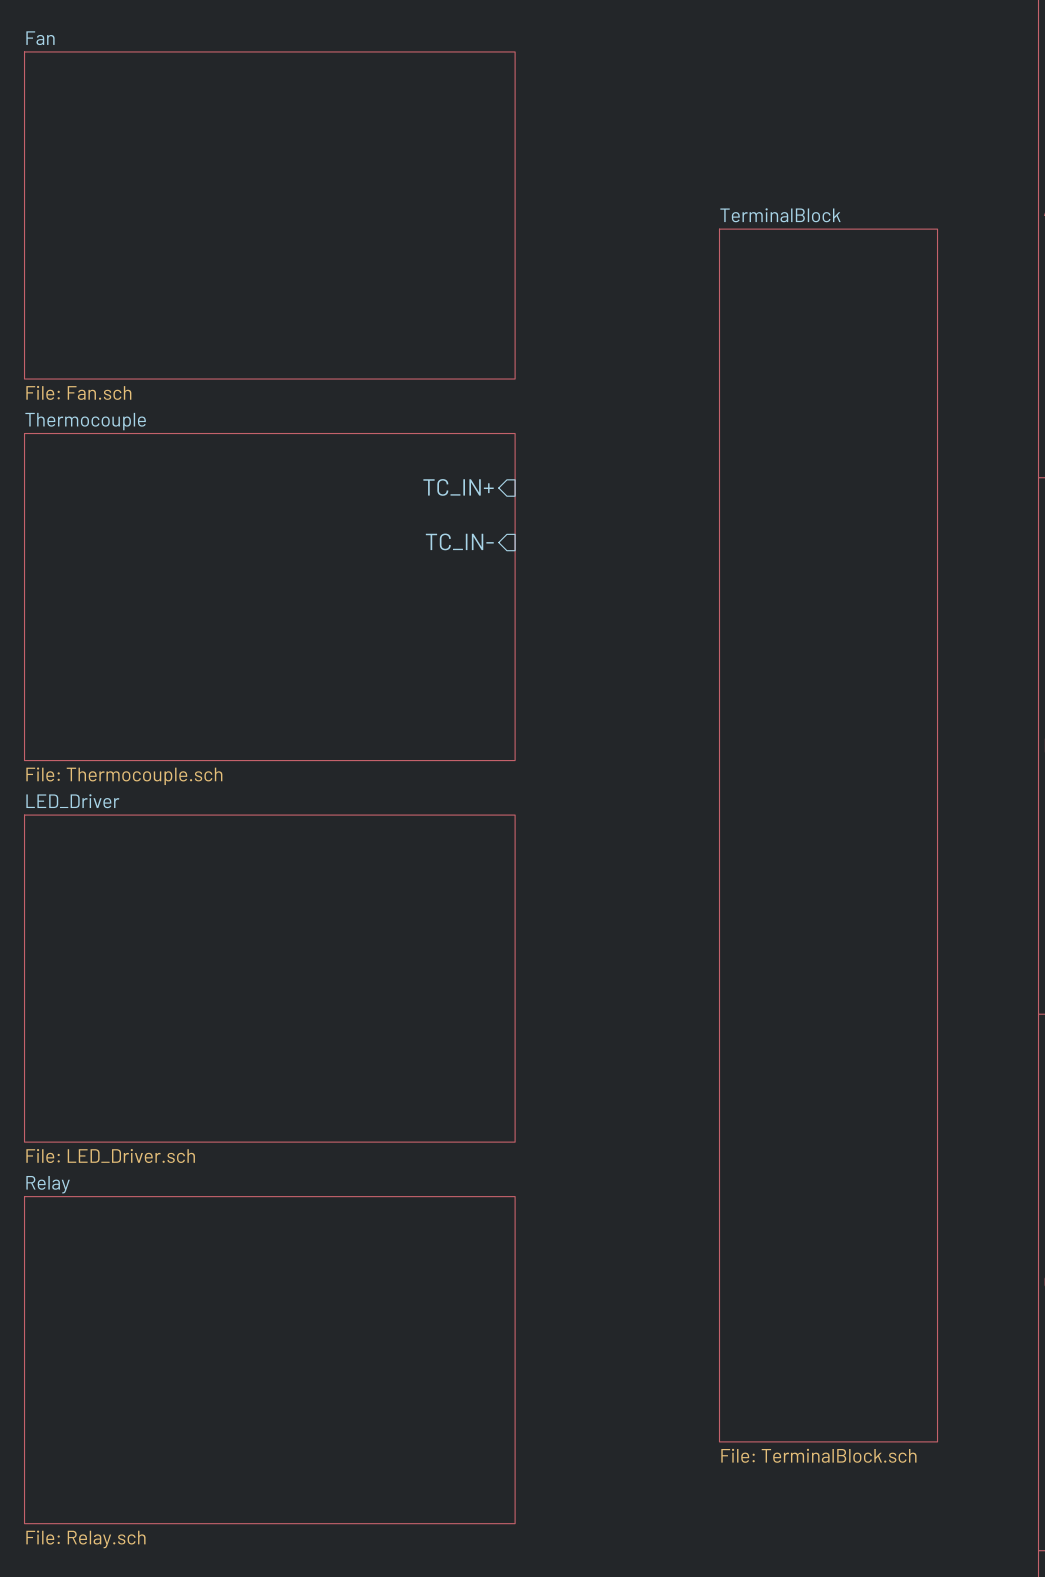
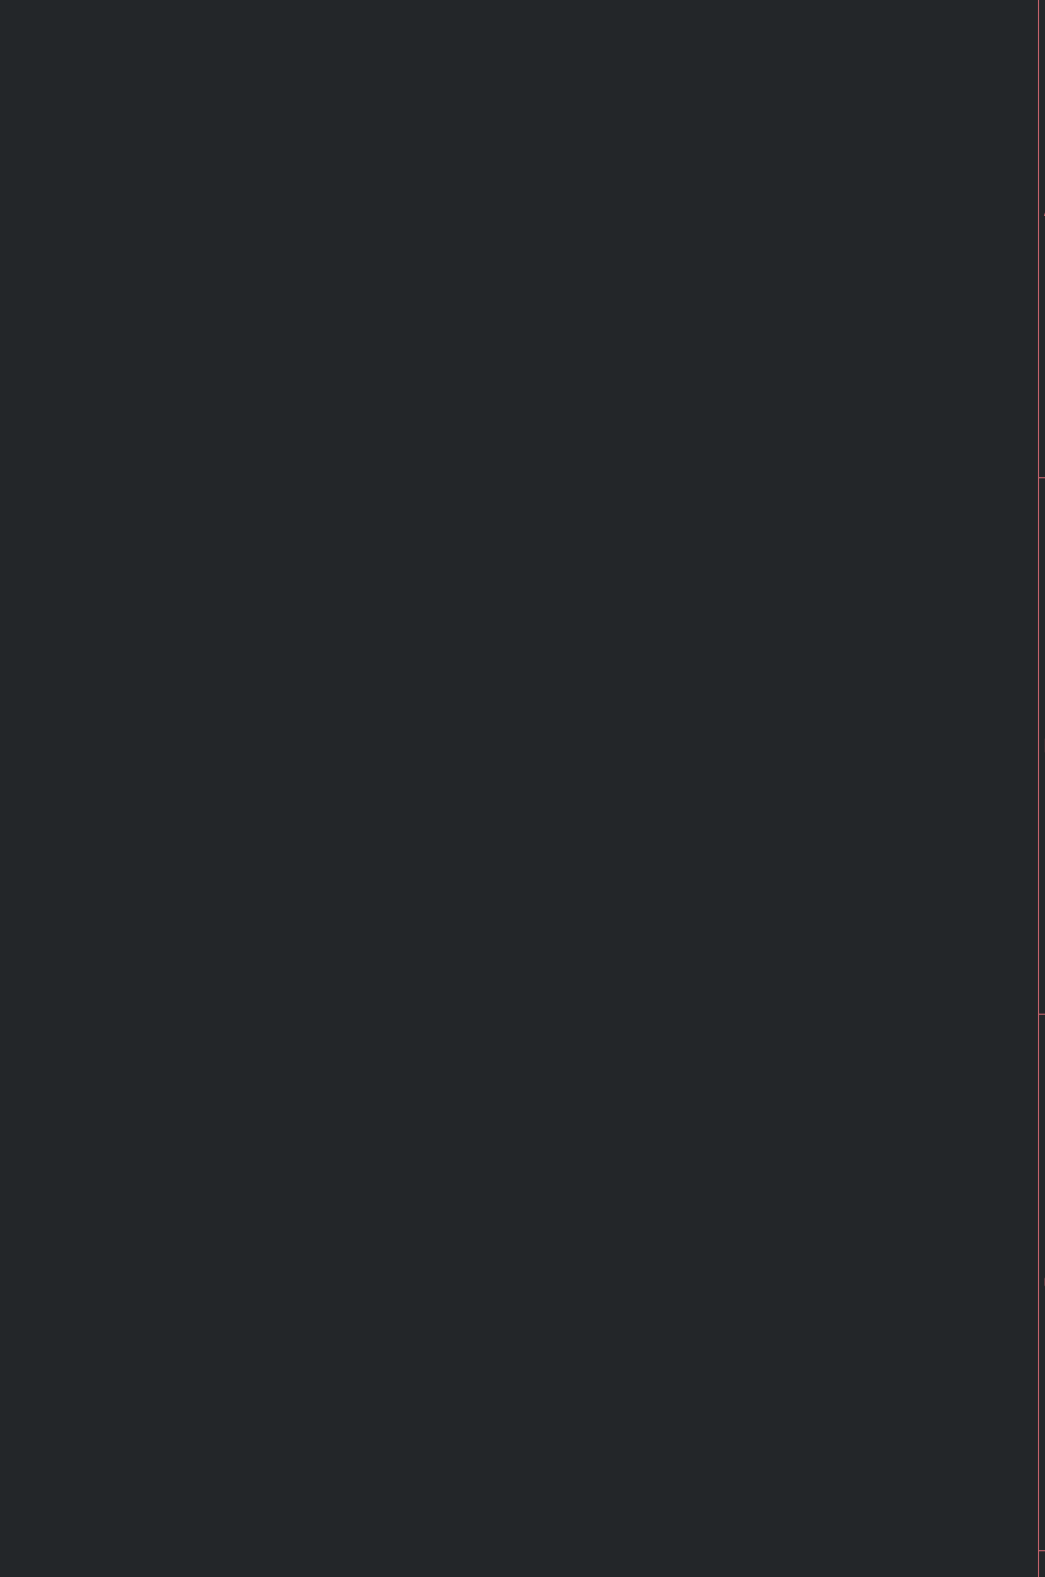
sheet Fan: File: Fan.sch (269, 215) -> none
sheet pin: TC_IN+ (458, 487) -> none
sheet pin: TC_IN- (459, 541) -> none
sheet Thermocouple: File: Thermocouple.sch (269, 597) -> none
sheet TerminalBlock: File: TerminalBlock.sch (828, 835) -> none
sheet LED_Driver: File: LED_Driver.sch (269, 978) -> none
sheet Relay: File: Relay.sch (269, 1360) -> none

